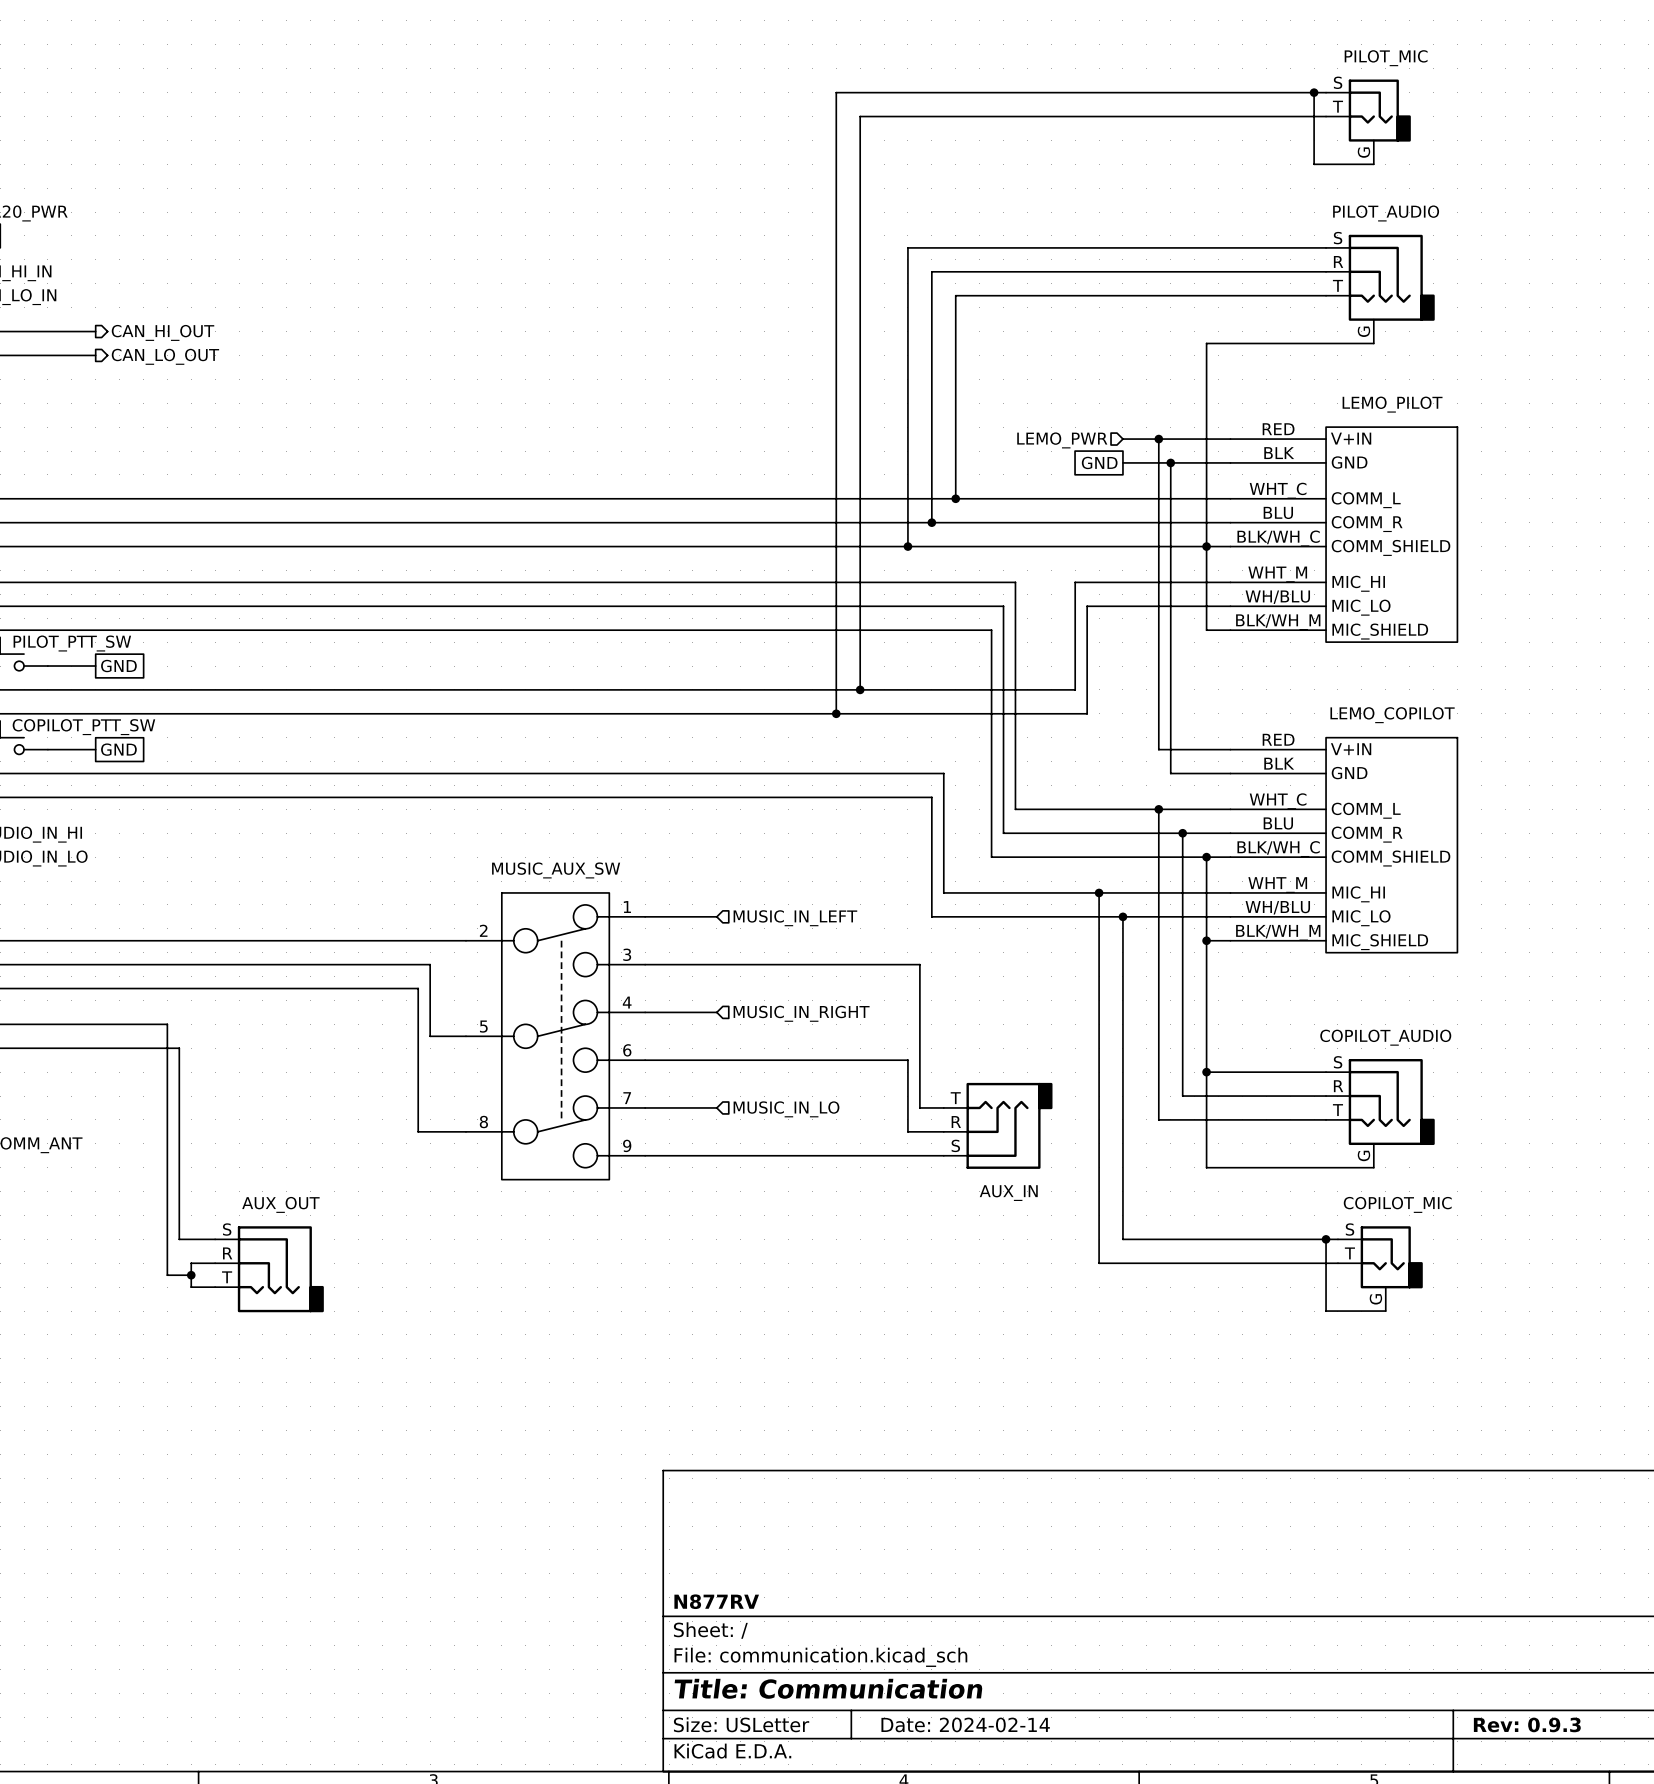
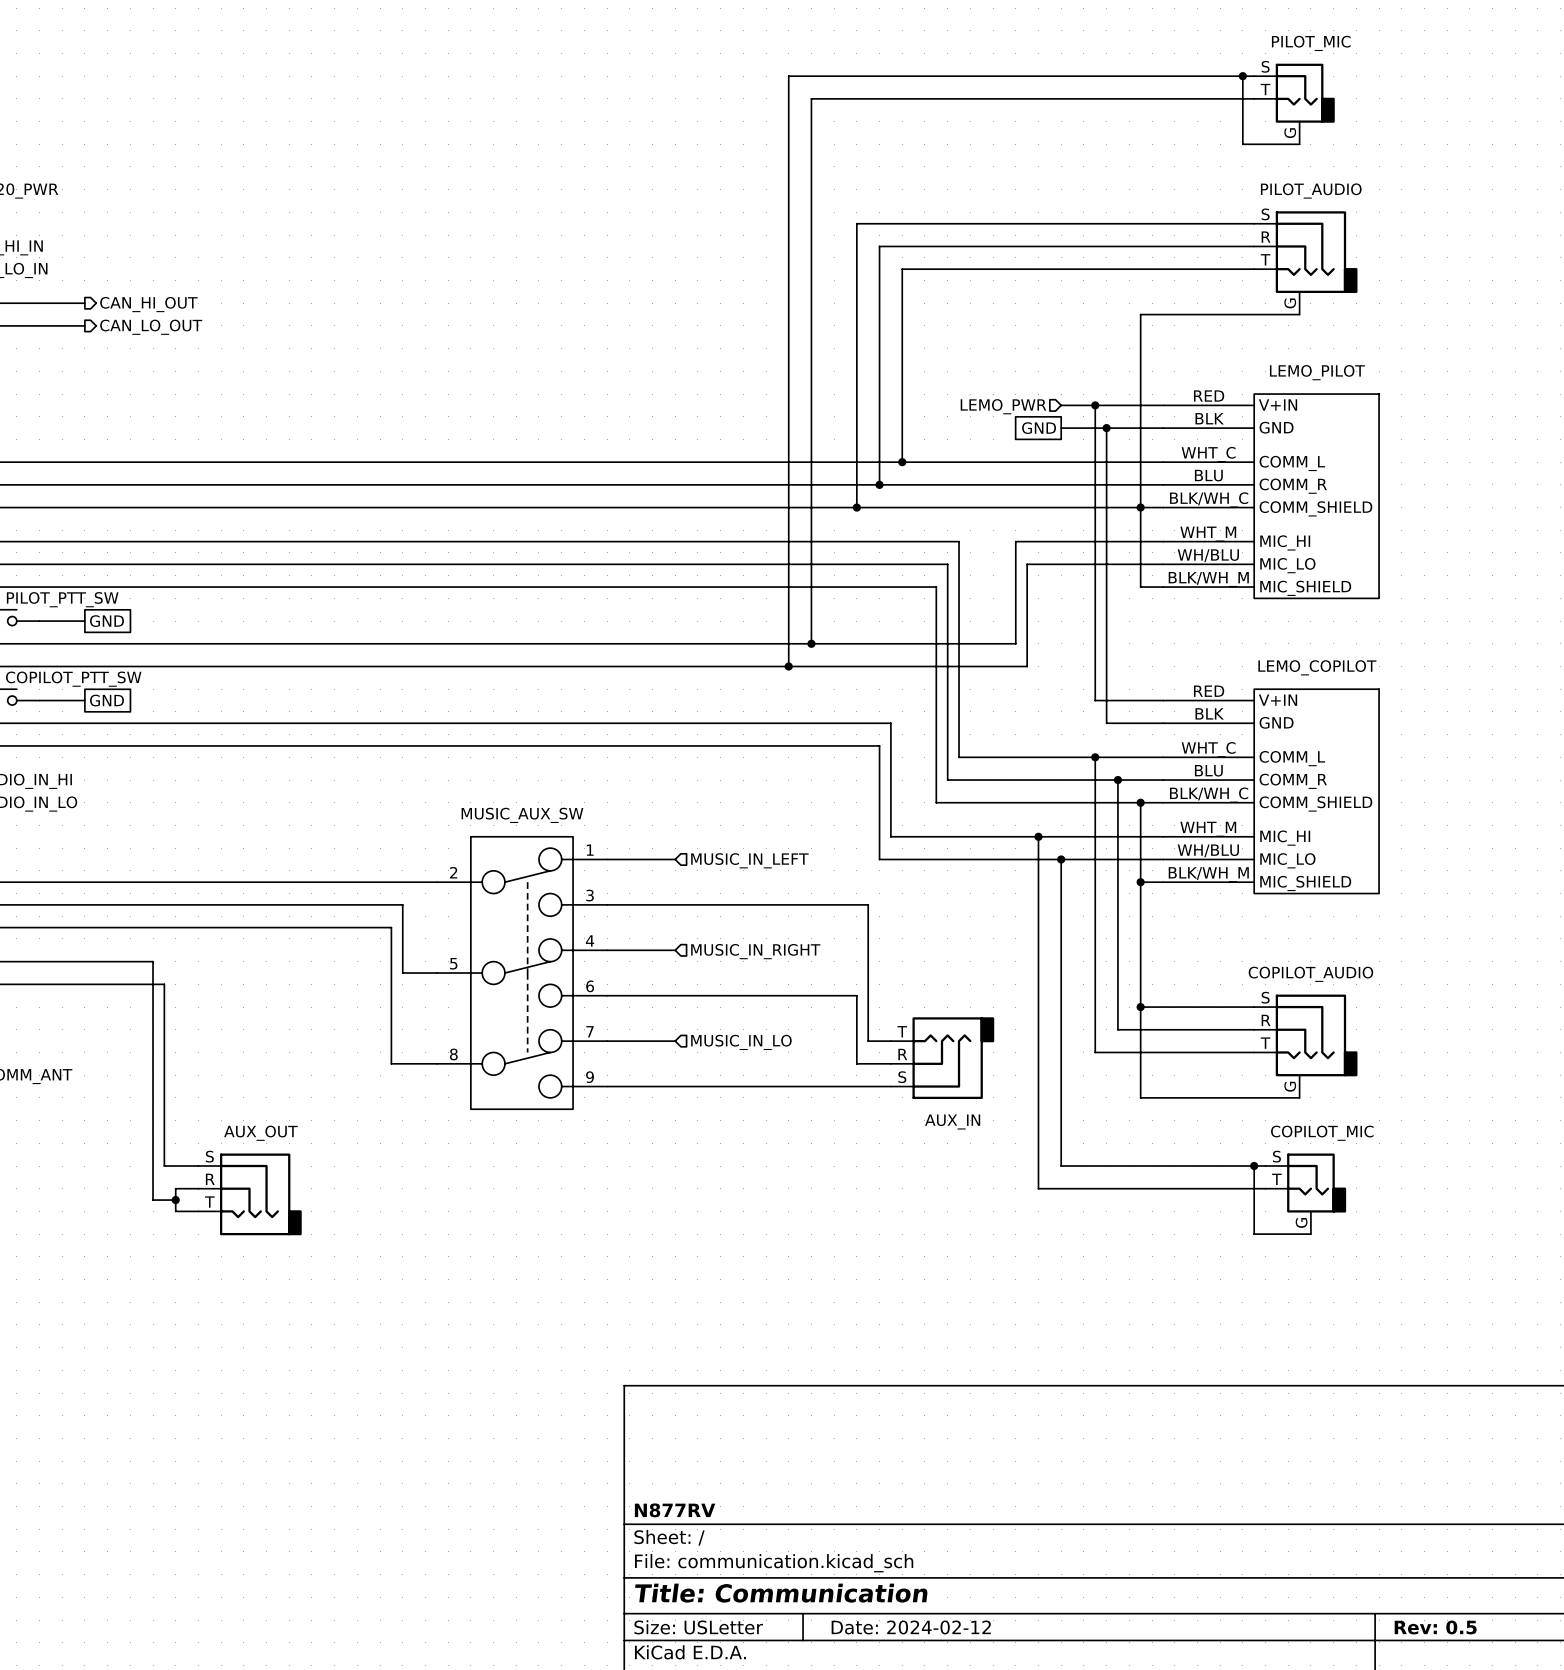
title block: Date: 2024-02-14 (965, 1724) -> Date: 2024-02-12 (911, 1627)
title block: Rev: 0.9.3 (1527, 1724) -> Rev: 0.5 (1435, 1627)

